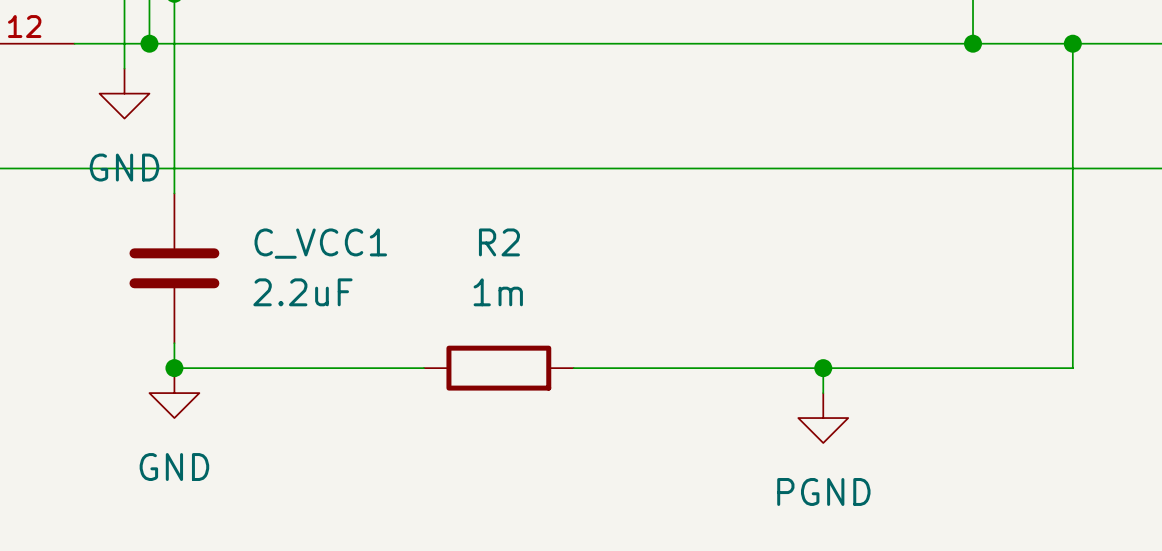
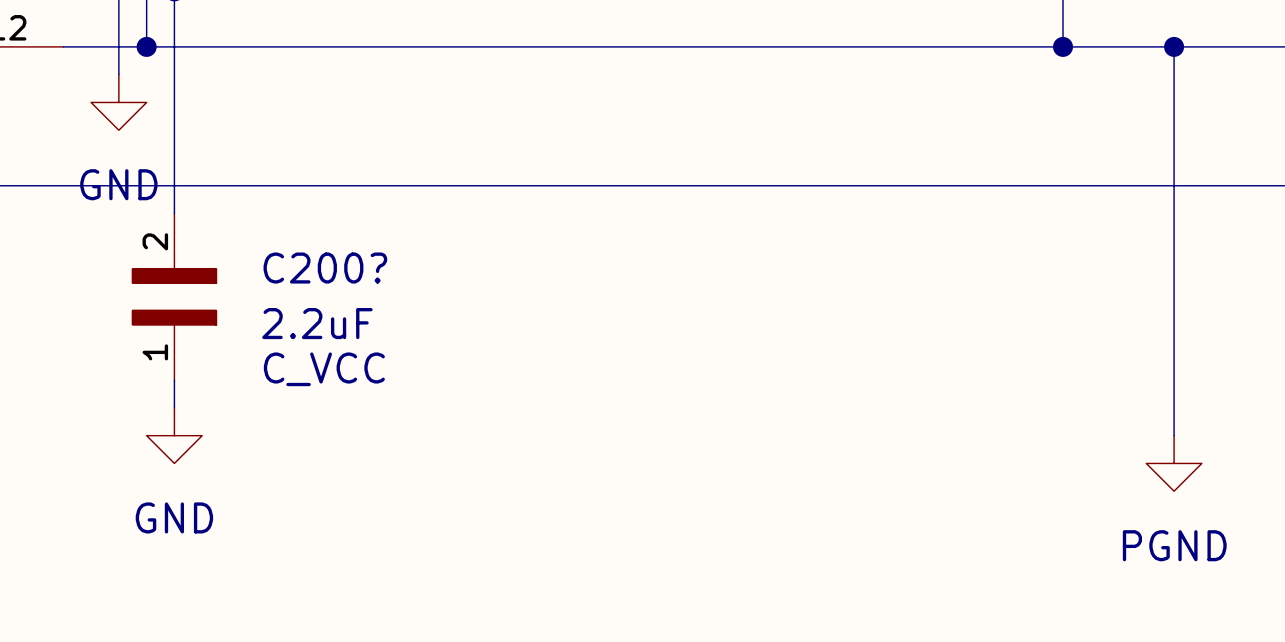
C_VCC1: 2.2uF (174, 268) -> none
C200?: none -> 2.2uF (174, 296)
wire: (174, 368) (423, 368) -> none
junction: (174, 368) -> none
R2: 1m (498, 368) -> none
wire: (573, 368) (1072, 368) -> (1174, 435) (1174, 407)
wire: (823, 368) (823, 393) -> none
junction: (823, 368) -> none
power symbol position: PGND (823, 418) -> PGND (1174, 463)

